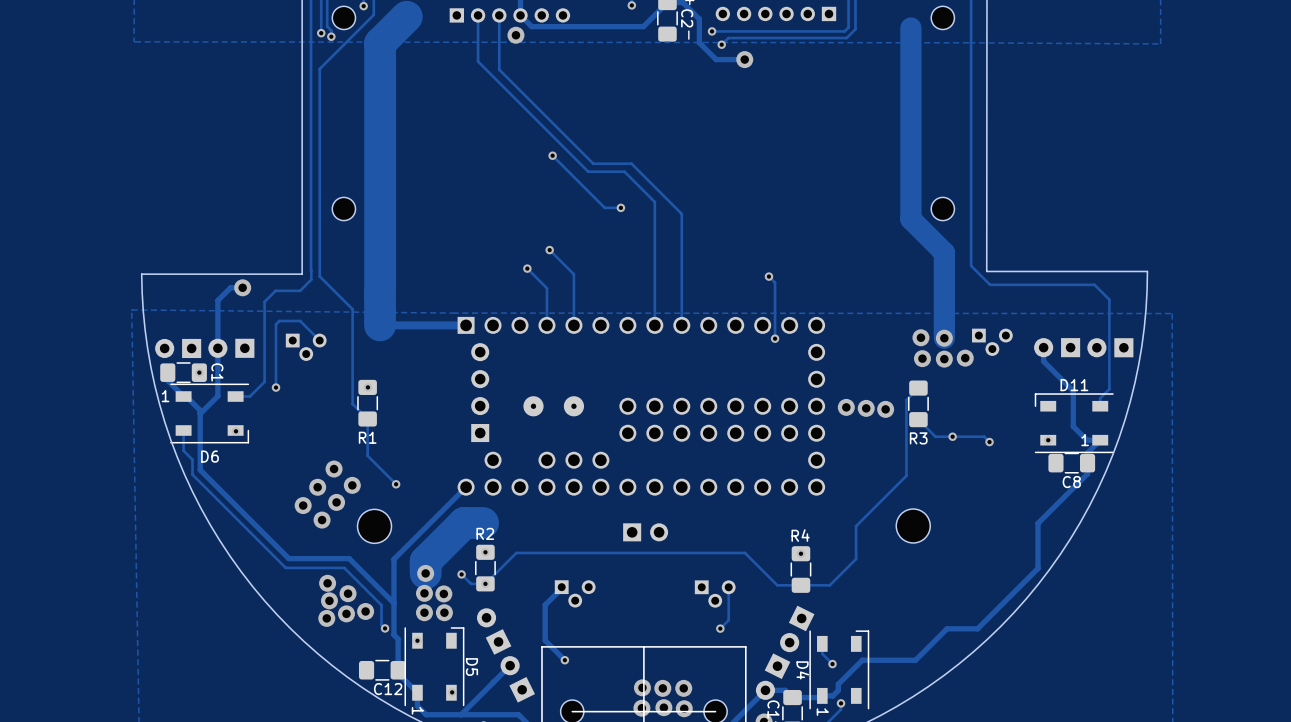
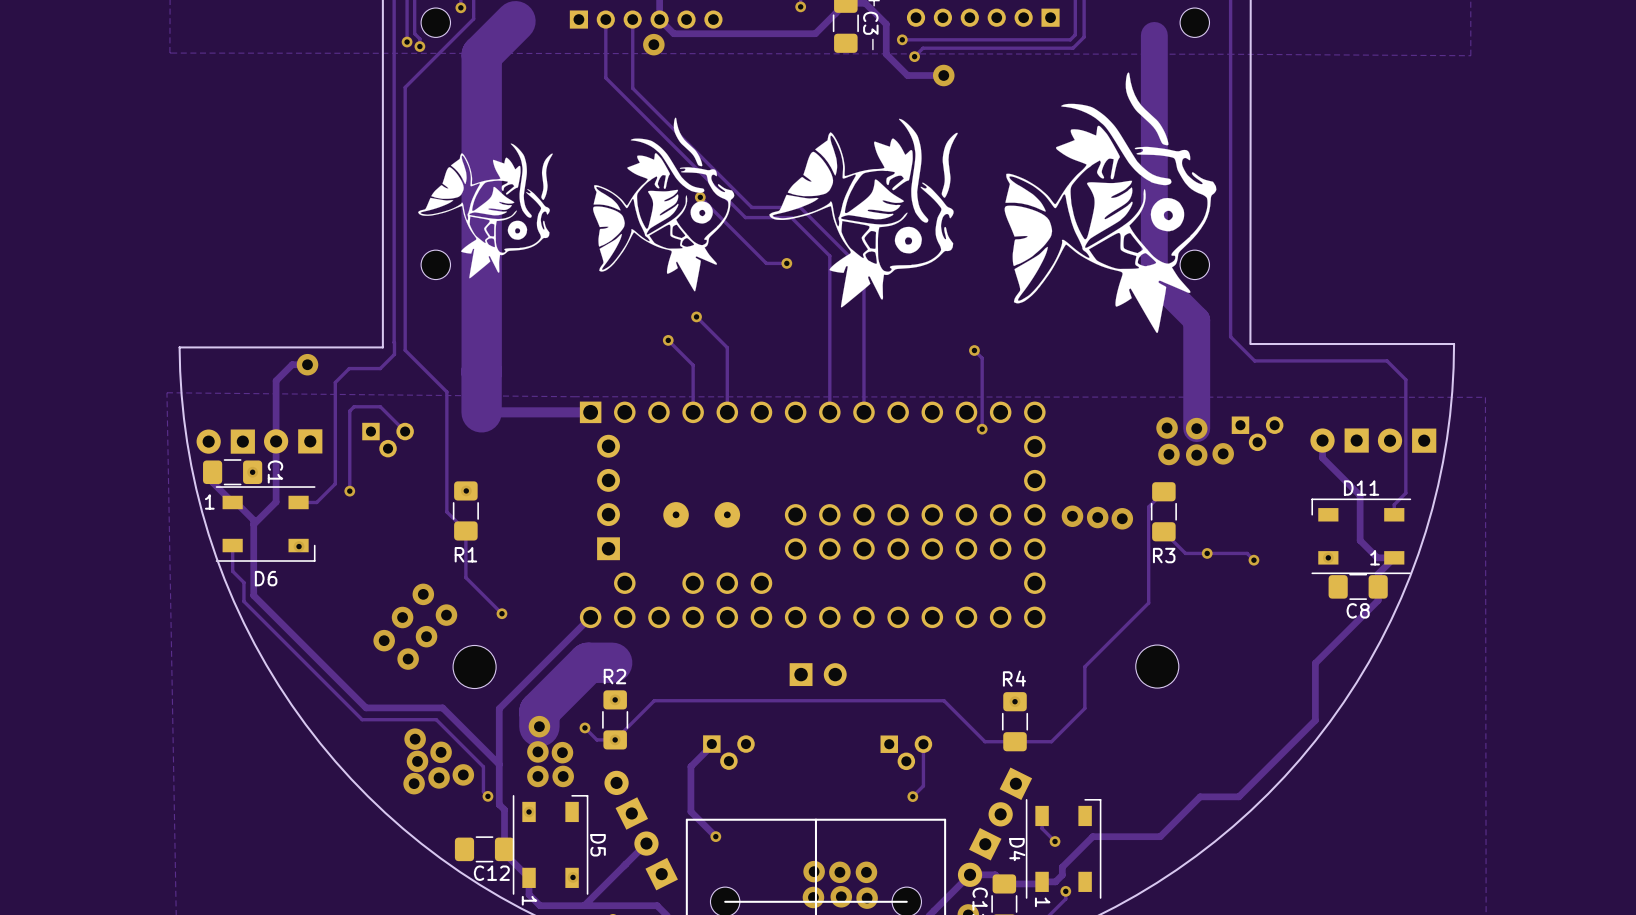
C2 name: C2 (687, 18) -> C3 (870, 23)
drawing: none -> [1004, 72, 1217, 333]
drawing: none -> [593, 117, 735, 292]
drawing: none -> [769, 118, 958, 308]
drawing: none -> [418, 143, 553, 279]

